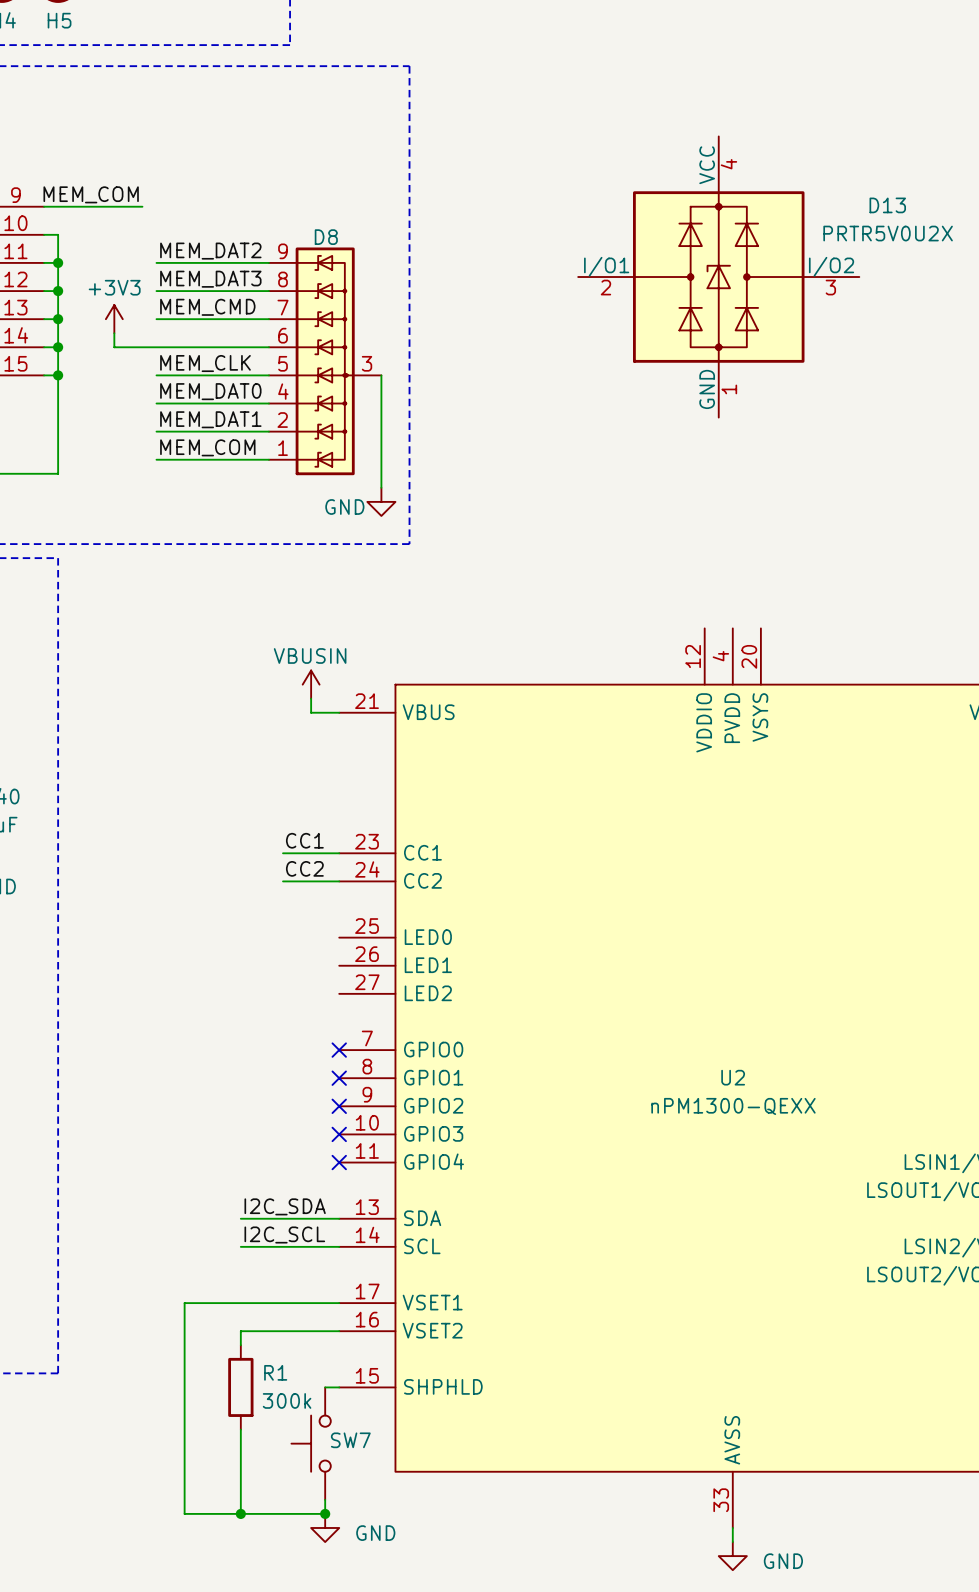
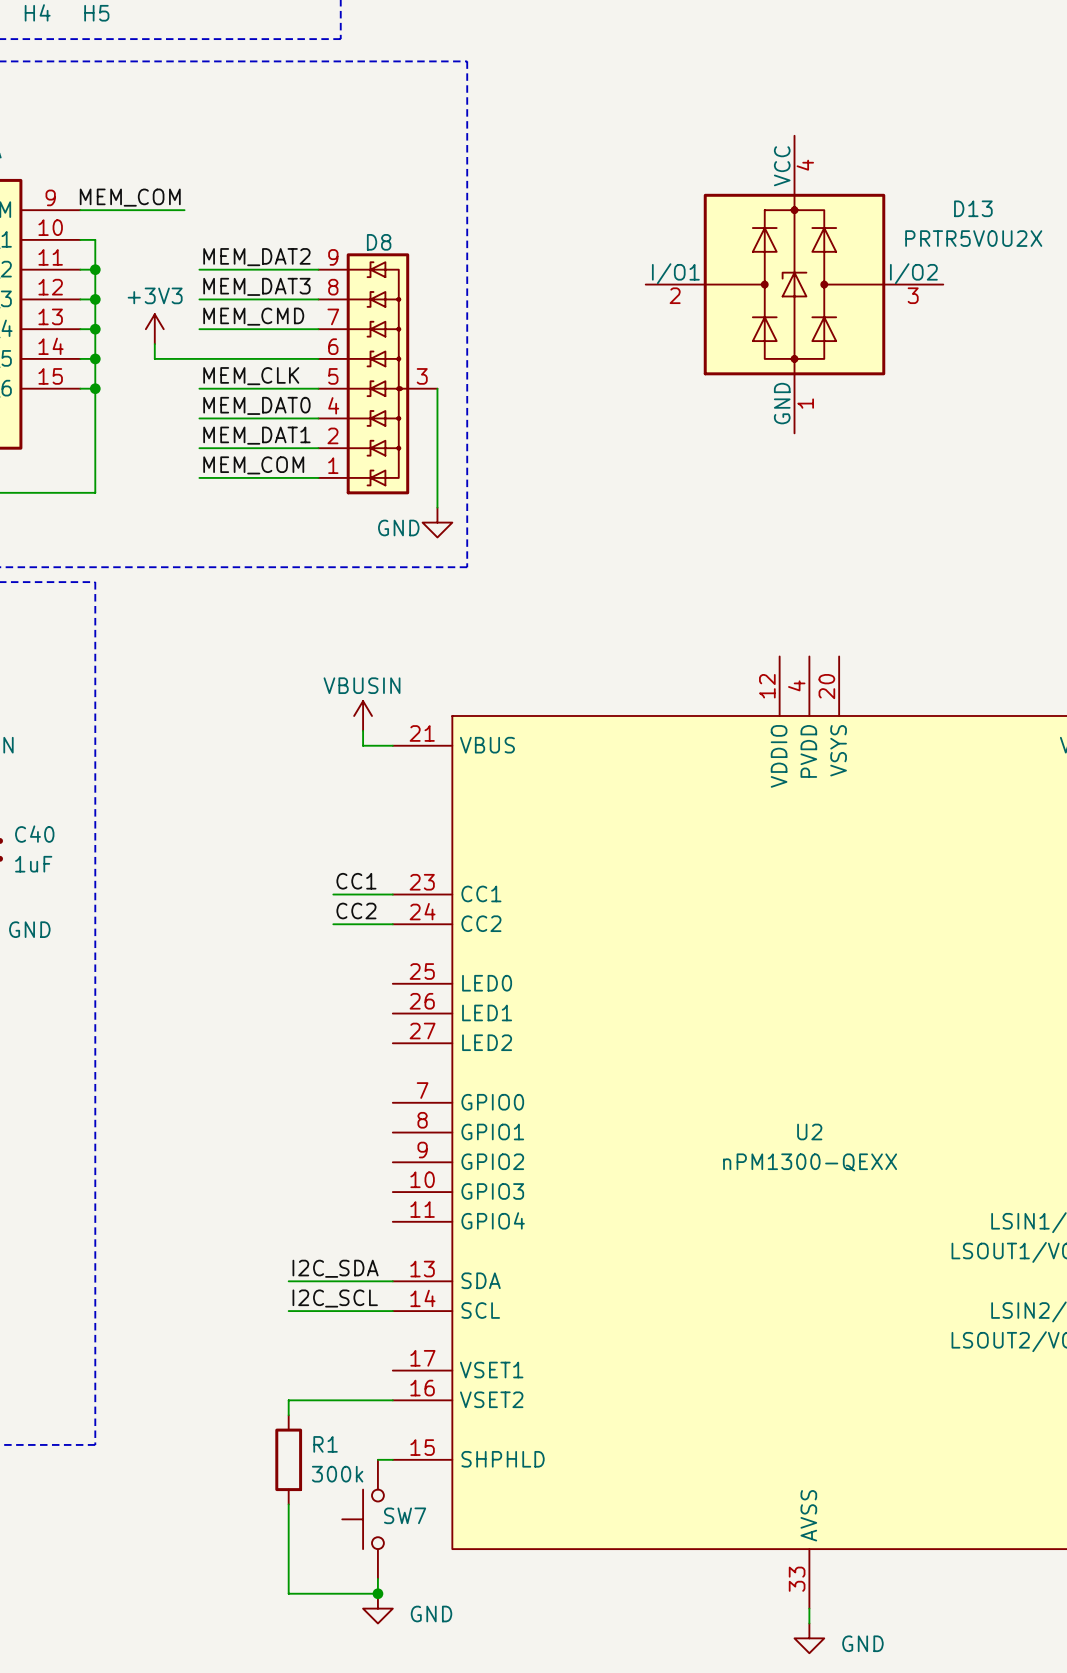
no-connect mark: (339, 1050) -> none
no-connect mark: (339, 1078) -> none
no-connect mark: (339, 1106) -> none
no-connect mark: (339, 1134) -> none
no-connect mark: (339, 1162) -> none
wire: (339, 1303) (184, 1303) (184, 1513) (240, 1513) -> none
junction: (240, 1513) -> none

